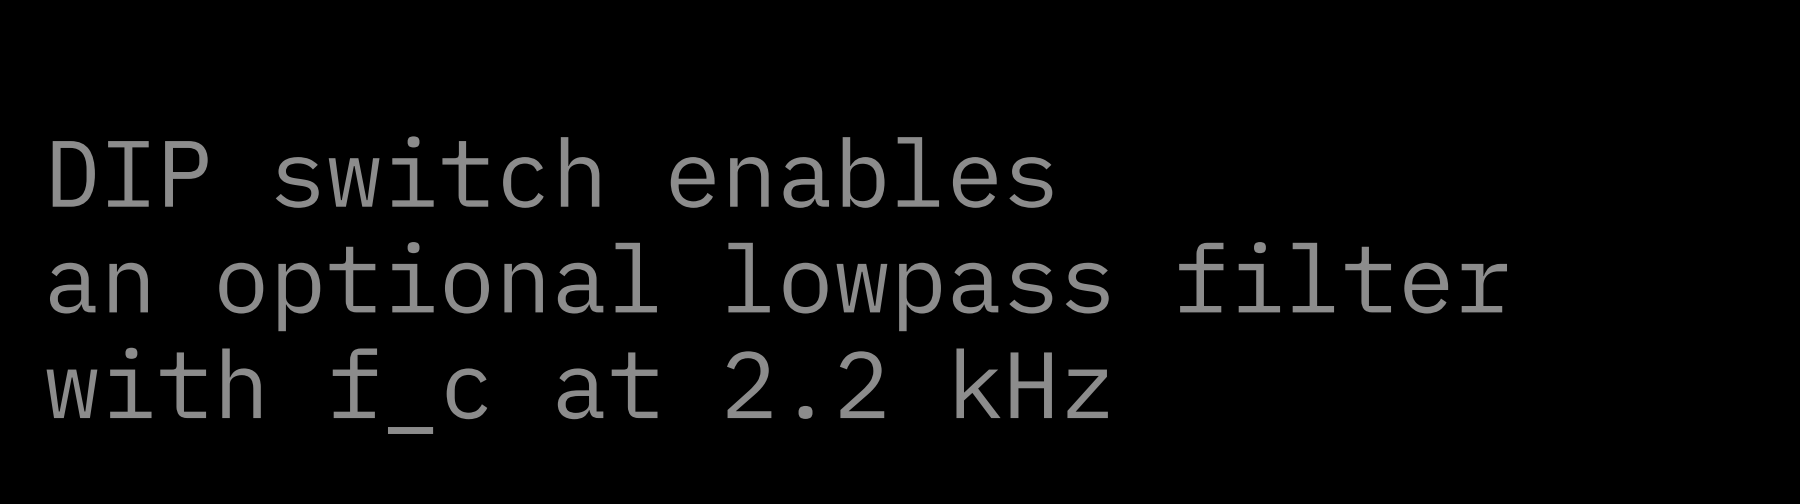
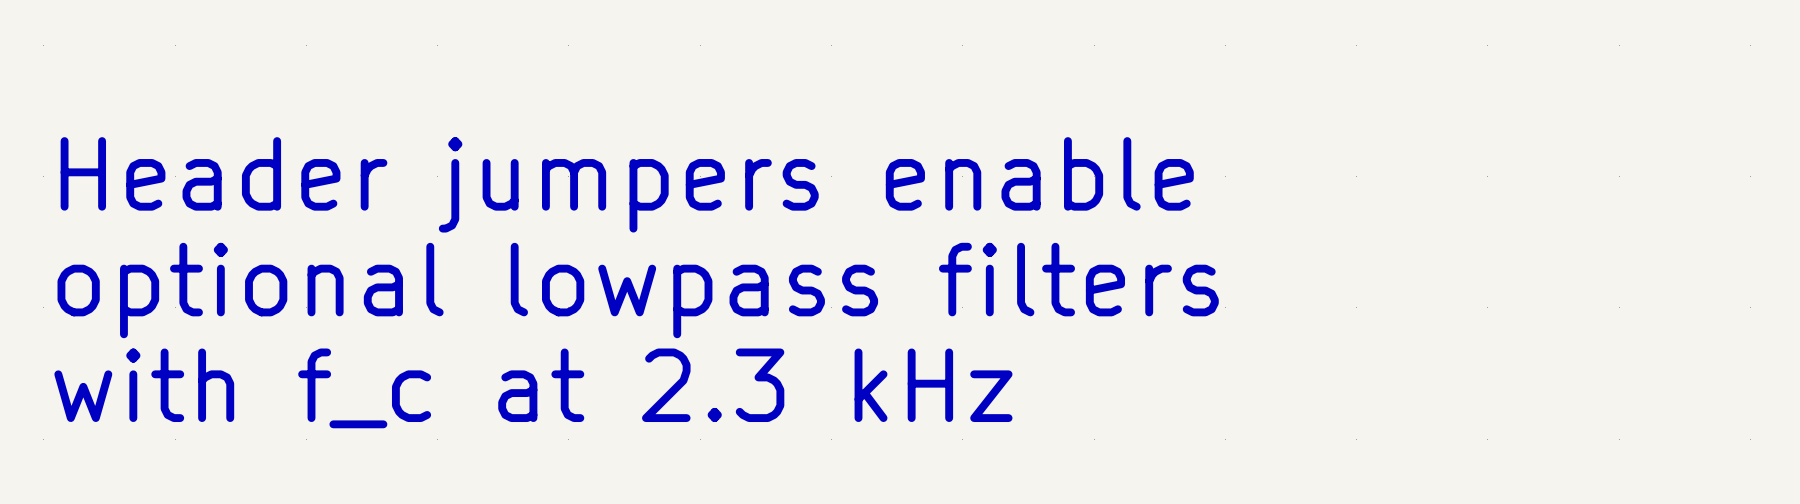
text: DIP switch enables (552, 172) -> Header jumpers enable (627, 184)
text: an optional lowpass filter (778, 286) -> optional lowpass filters (638, 290)
text: with f_c at 2.2 kHz (577, 390) -> with f_c at 2.3 kHz (533, 388)

